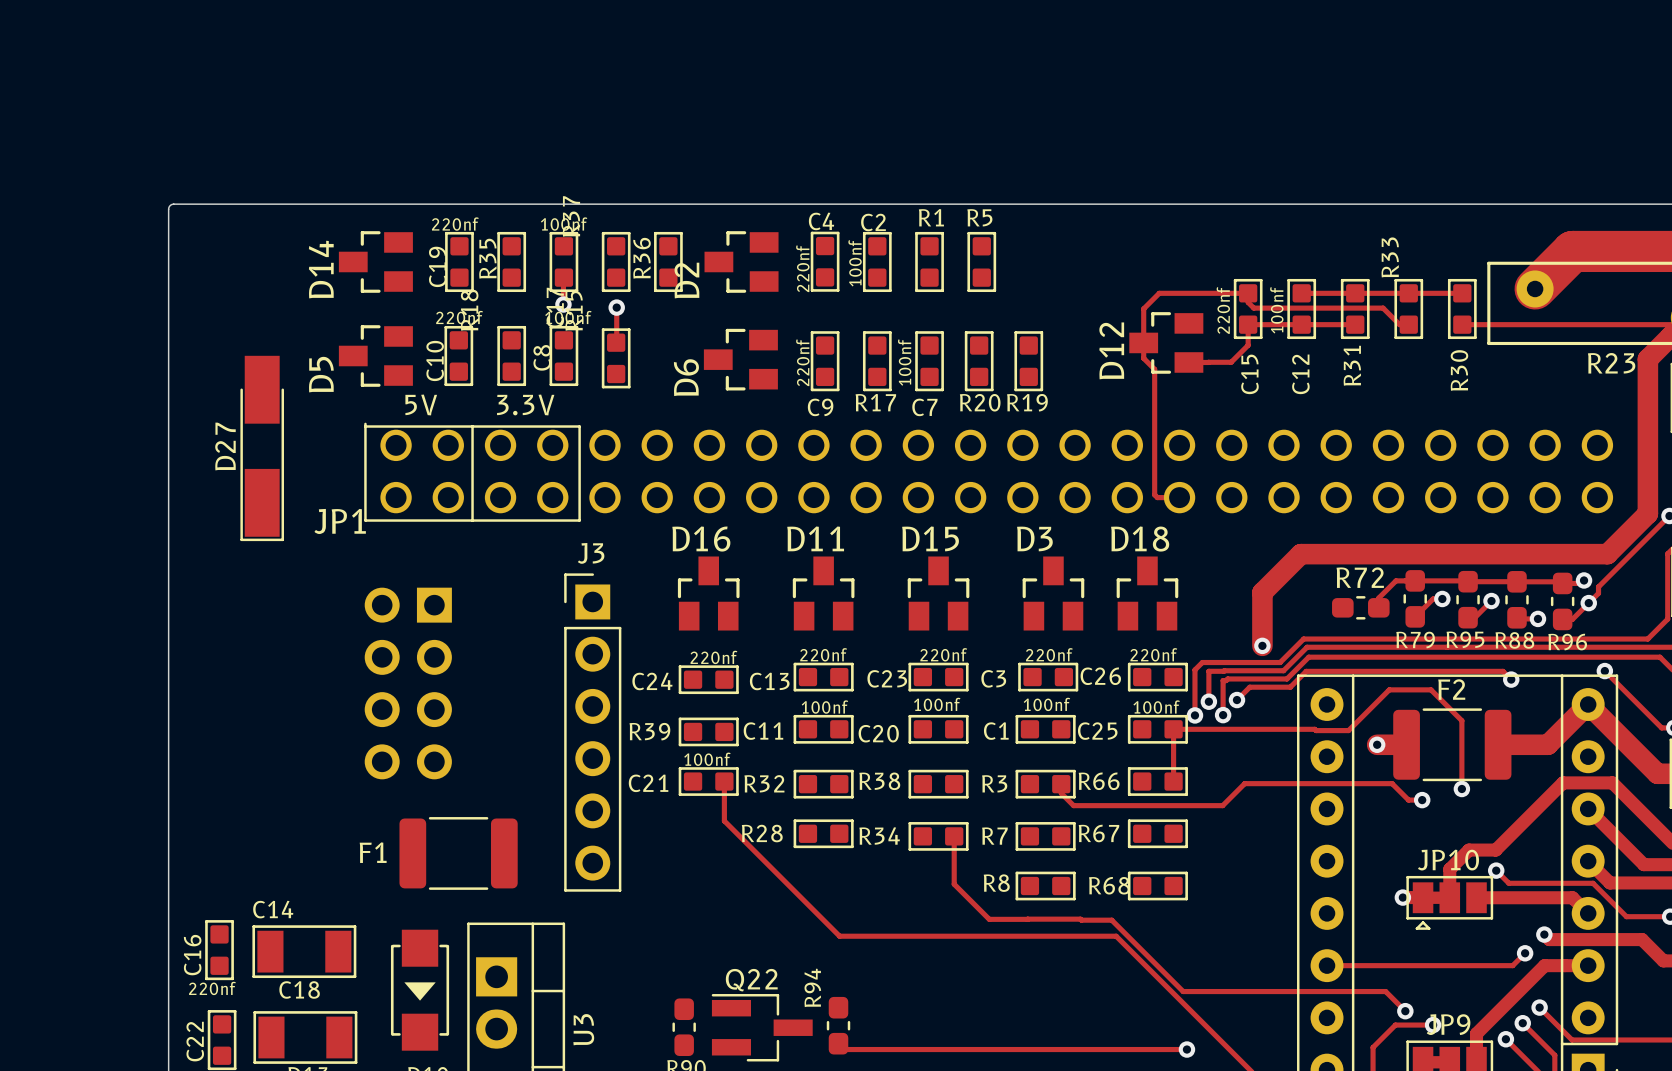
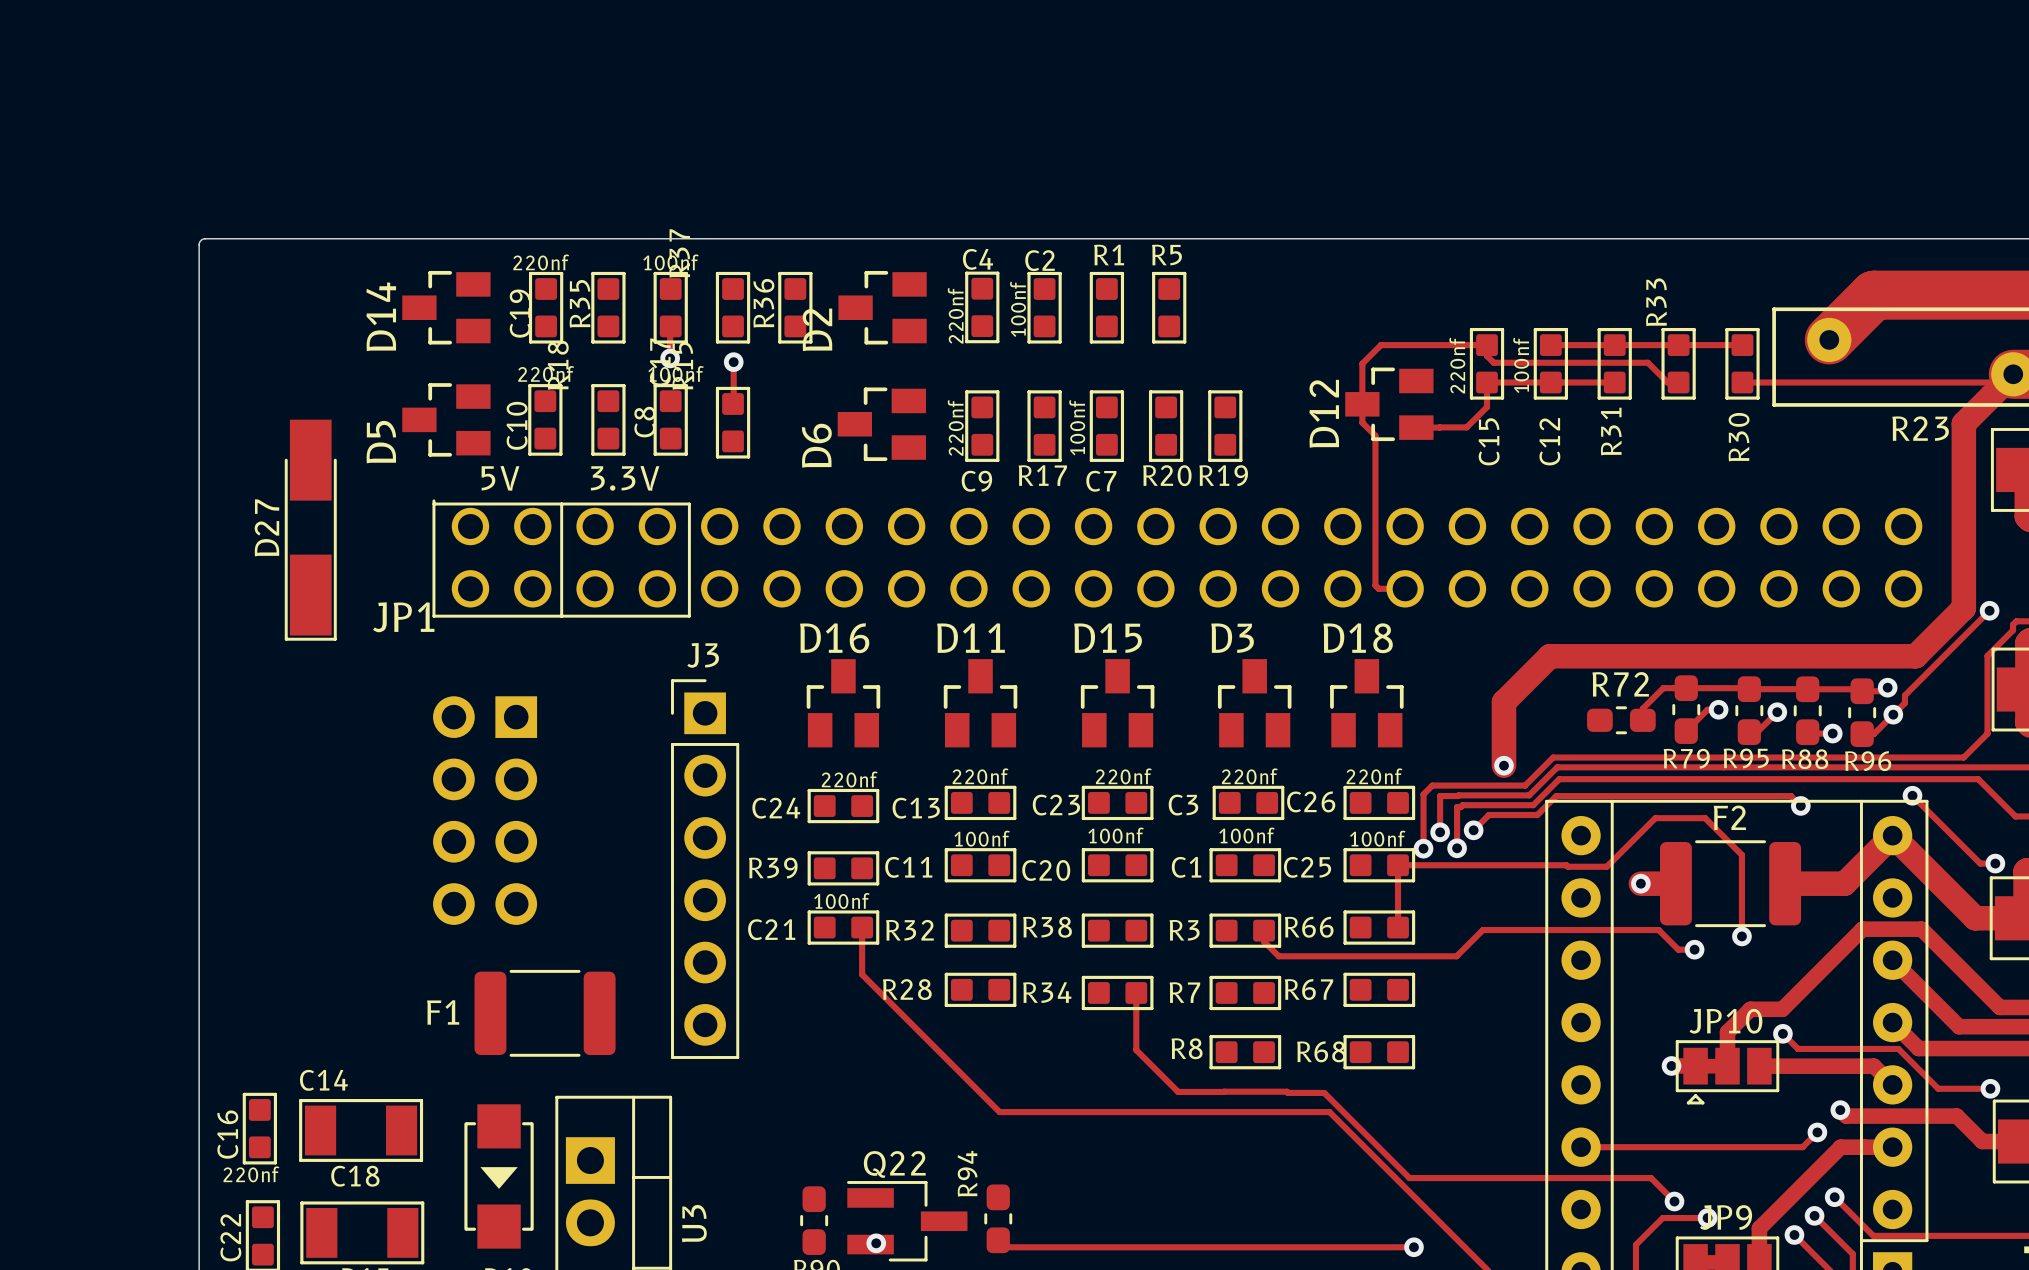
via: none -> (876, 1243)

